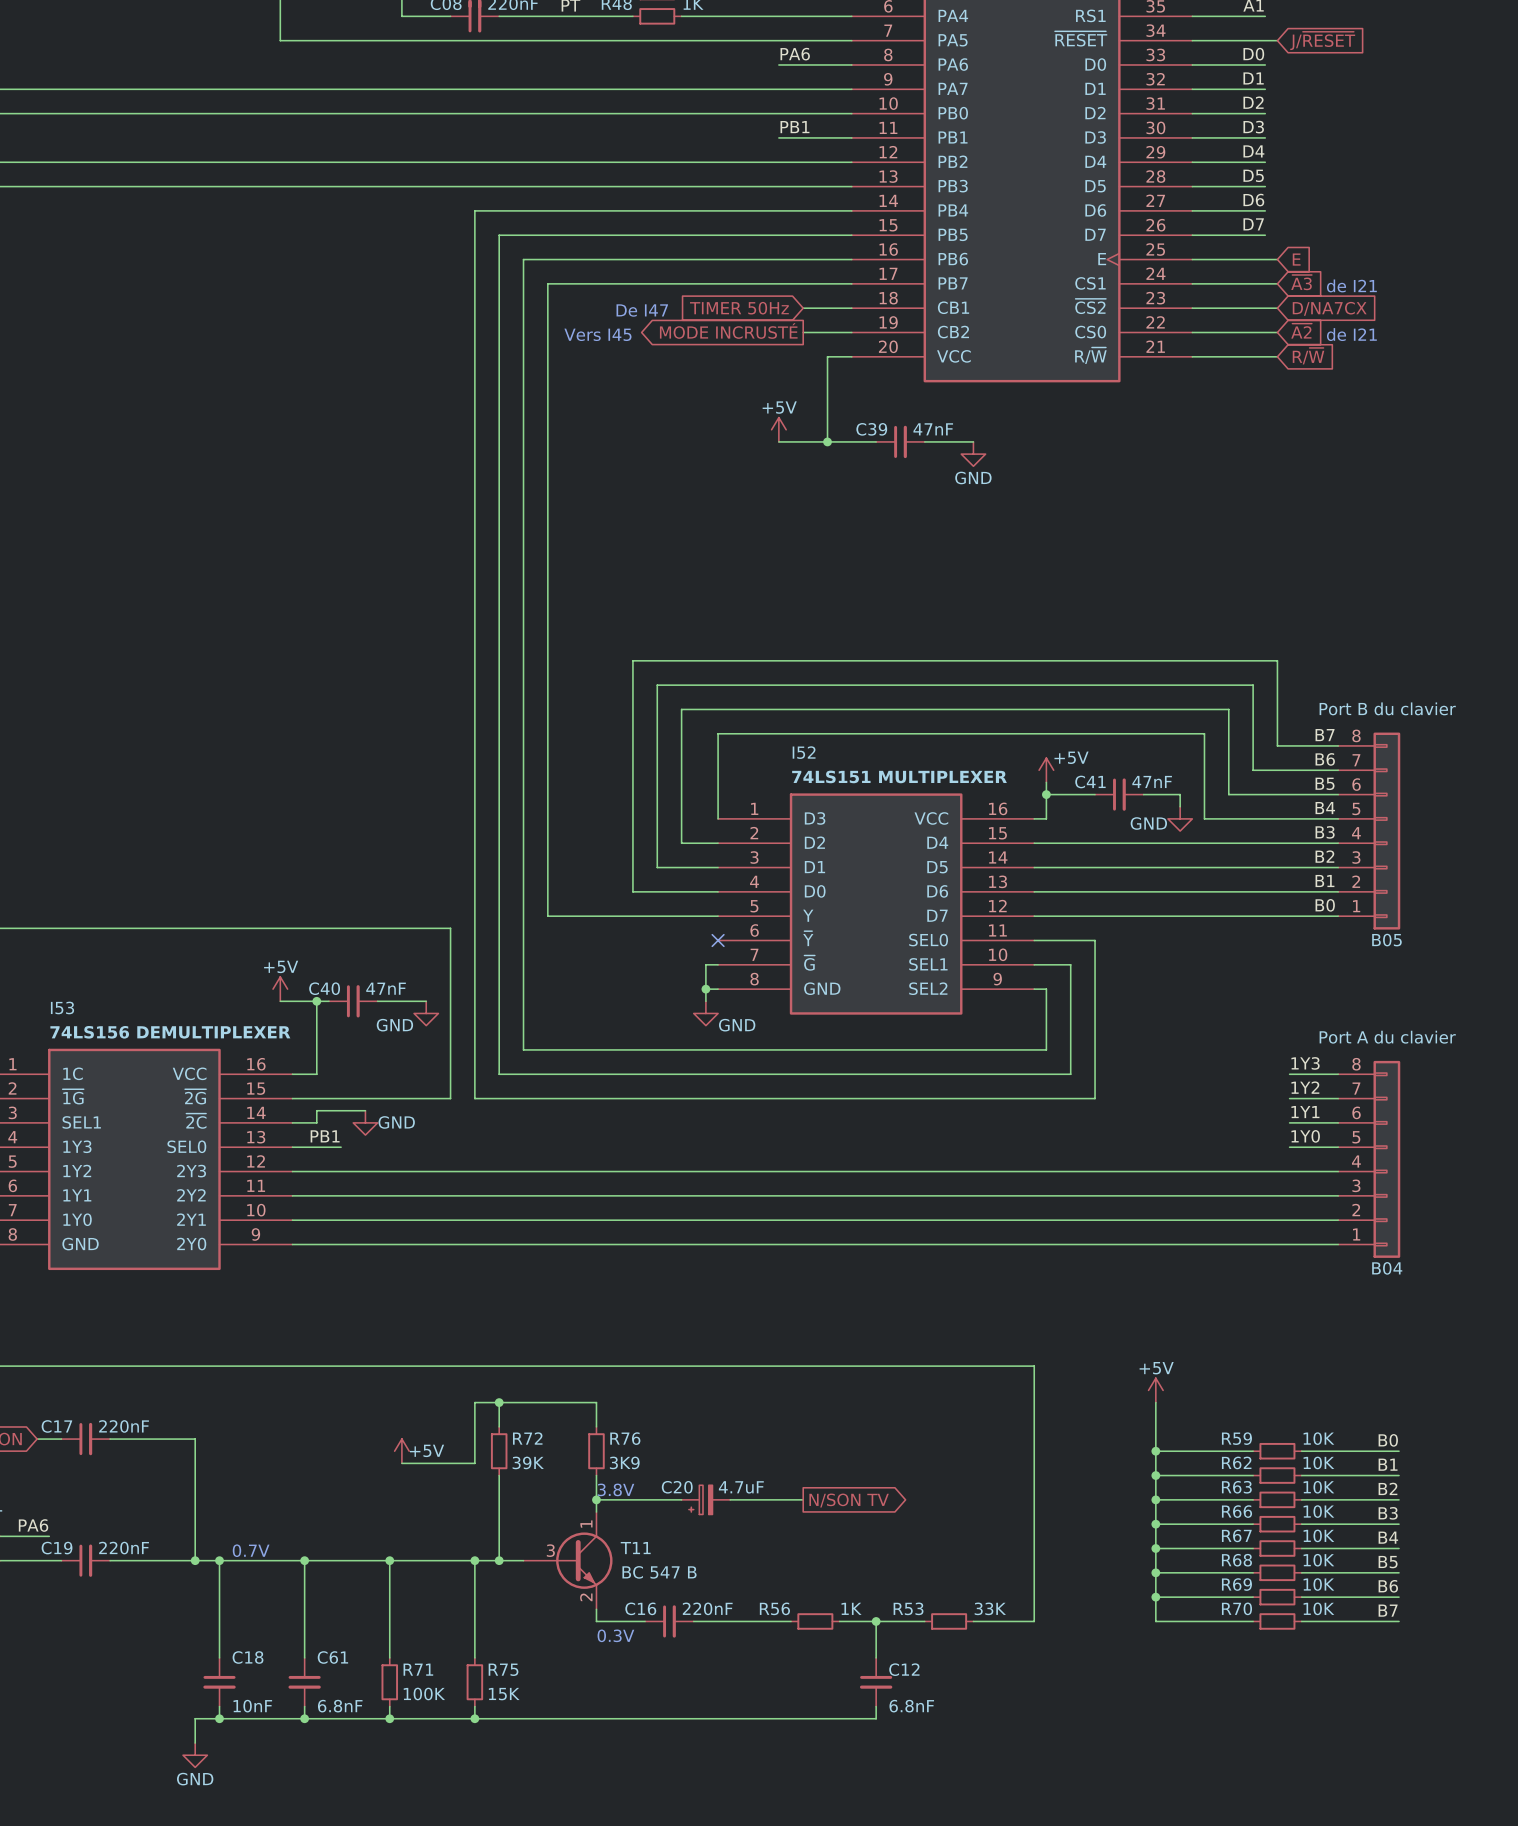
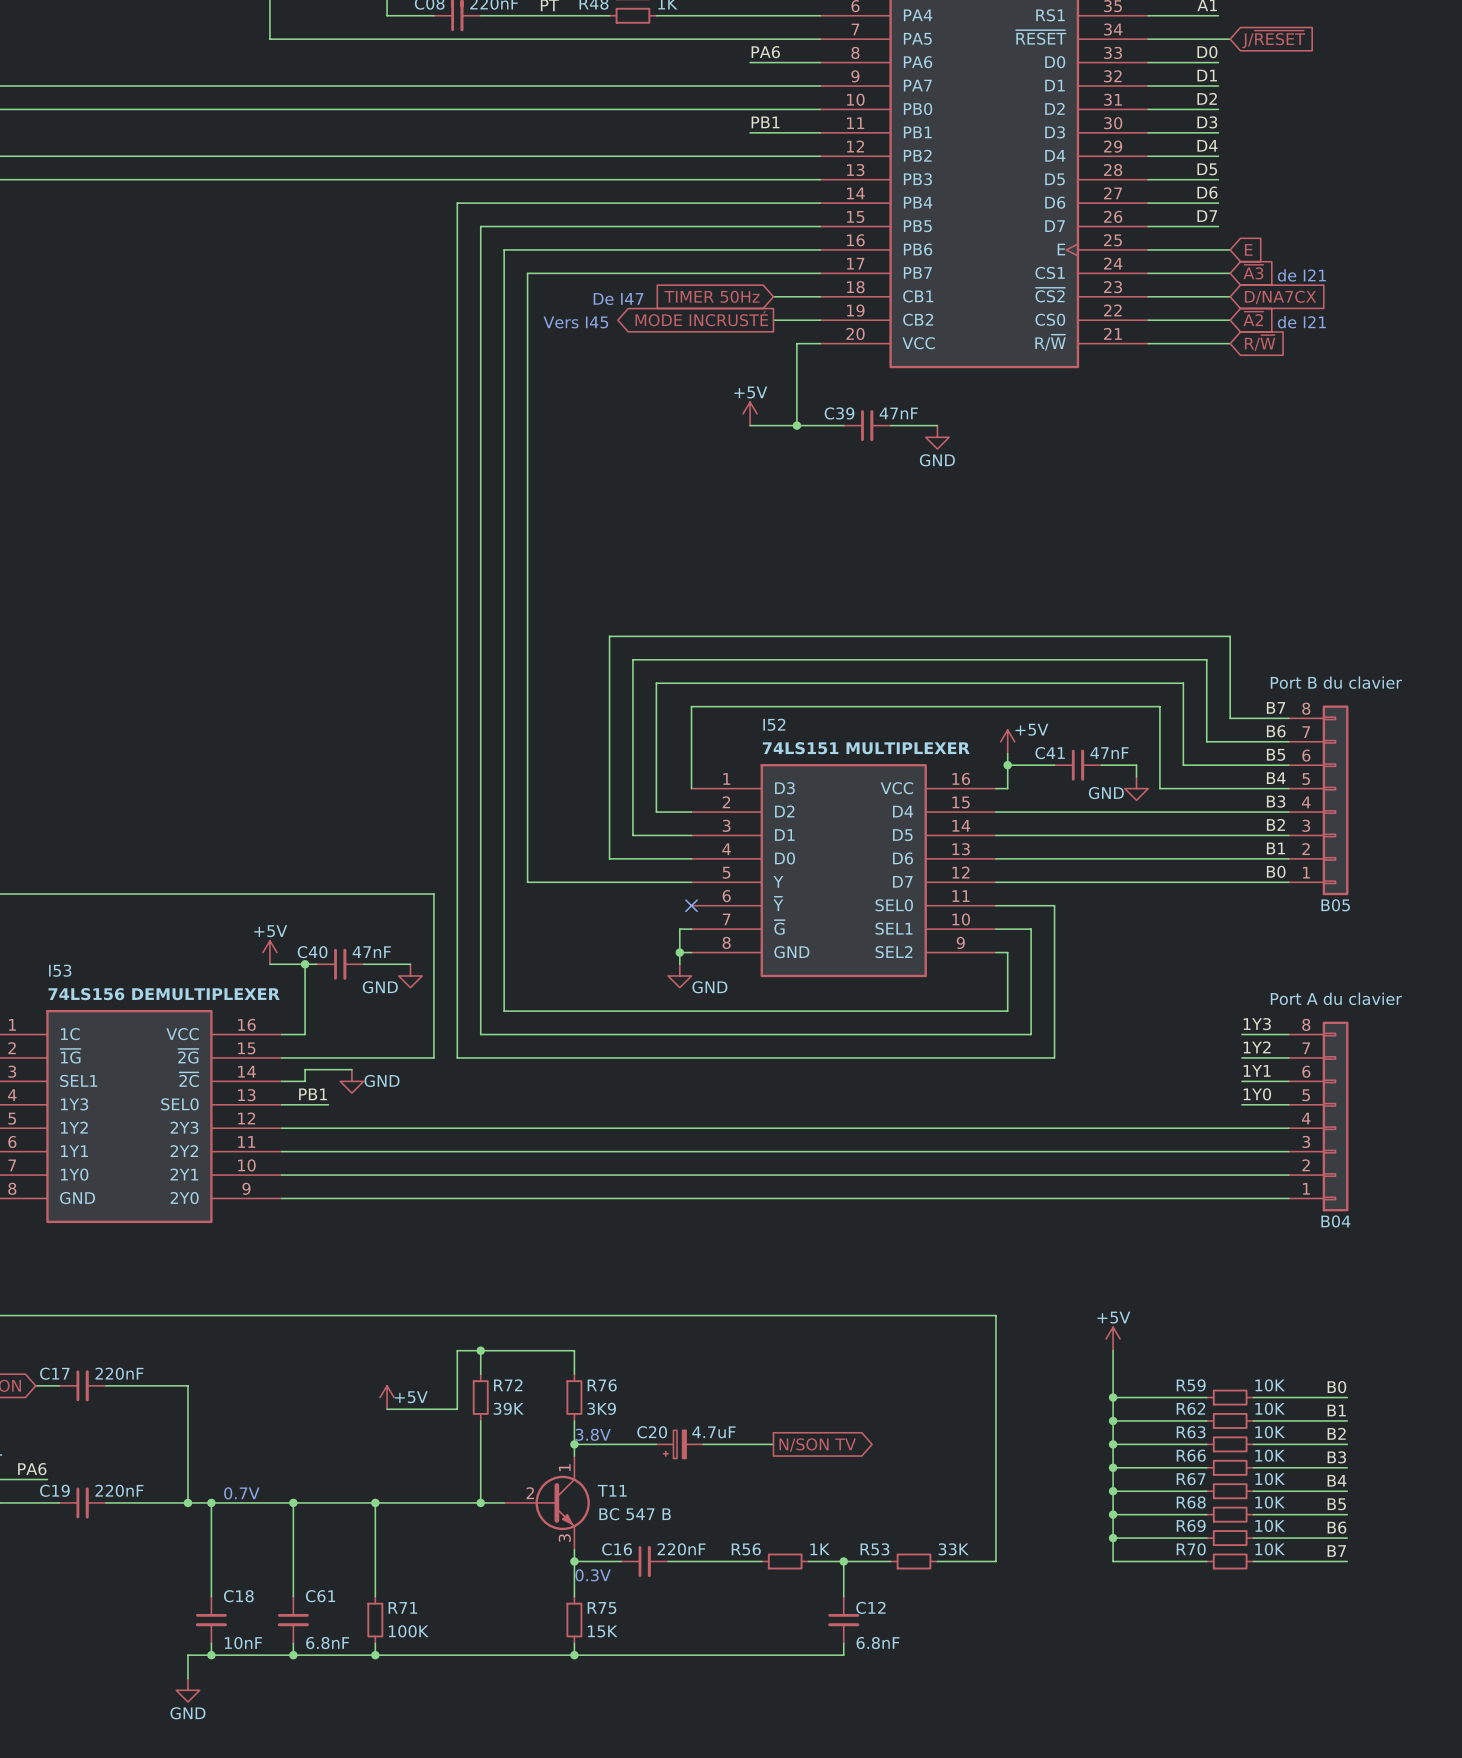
T11 pin number: 3 (550, 1550) -> 2 (530, 1493)
wire: (474, 1560) (474, 1657) -> none
junction: (474, 1560) -> none
T11 pin number: 2 (586, 1597) -> 3 (564, 1538)
wire: none -> (574, 1561) (574, 1596)
junction: none -> (574, 1561)
R75 position: (474, 1682) -> (574, 1620)
wire: (474, 1706) (474, 1718) -> (574, 1643) (574, 1655)
junction: (474, 1718) -> none
junction: none -> (574, 1655)

